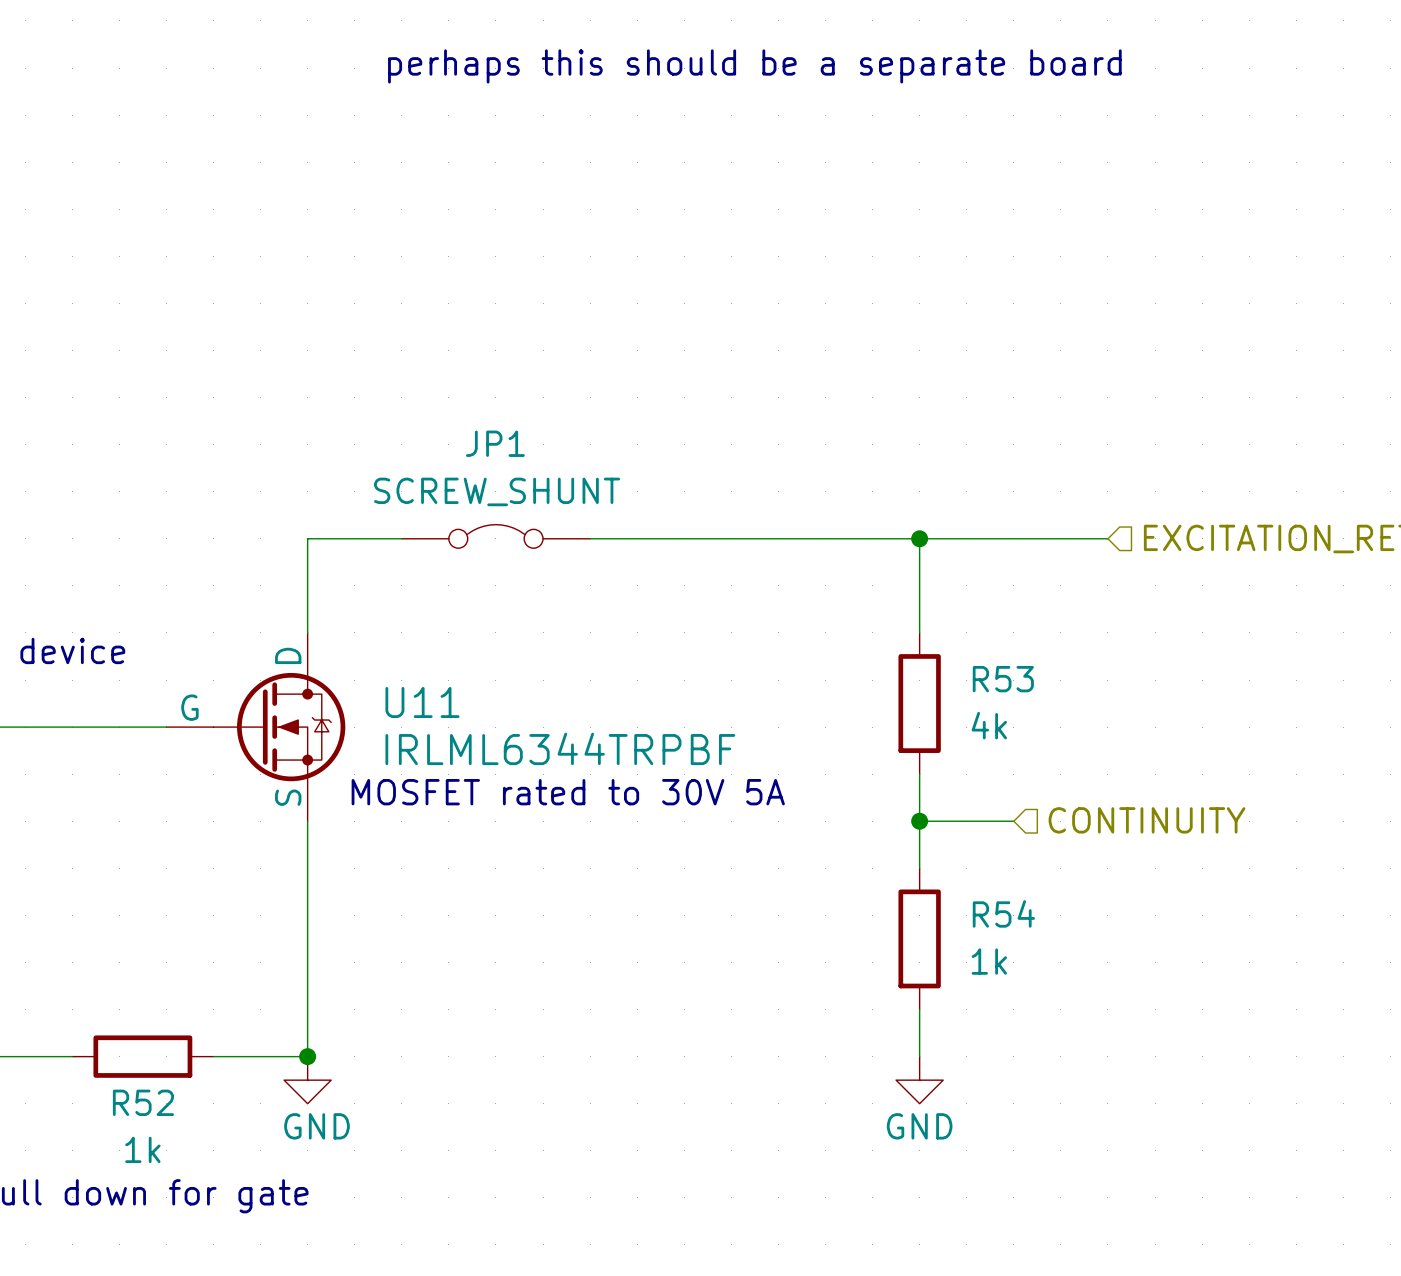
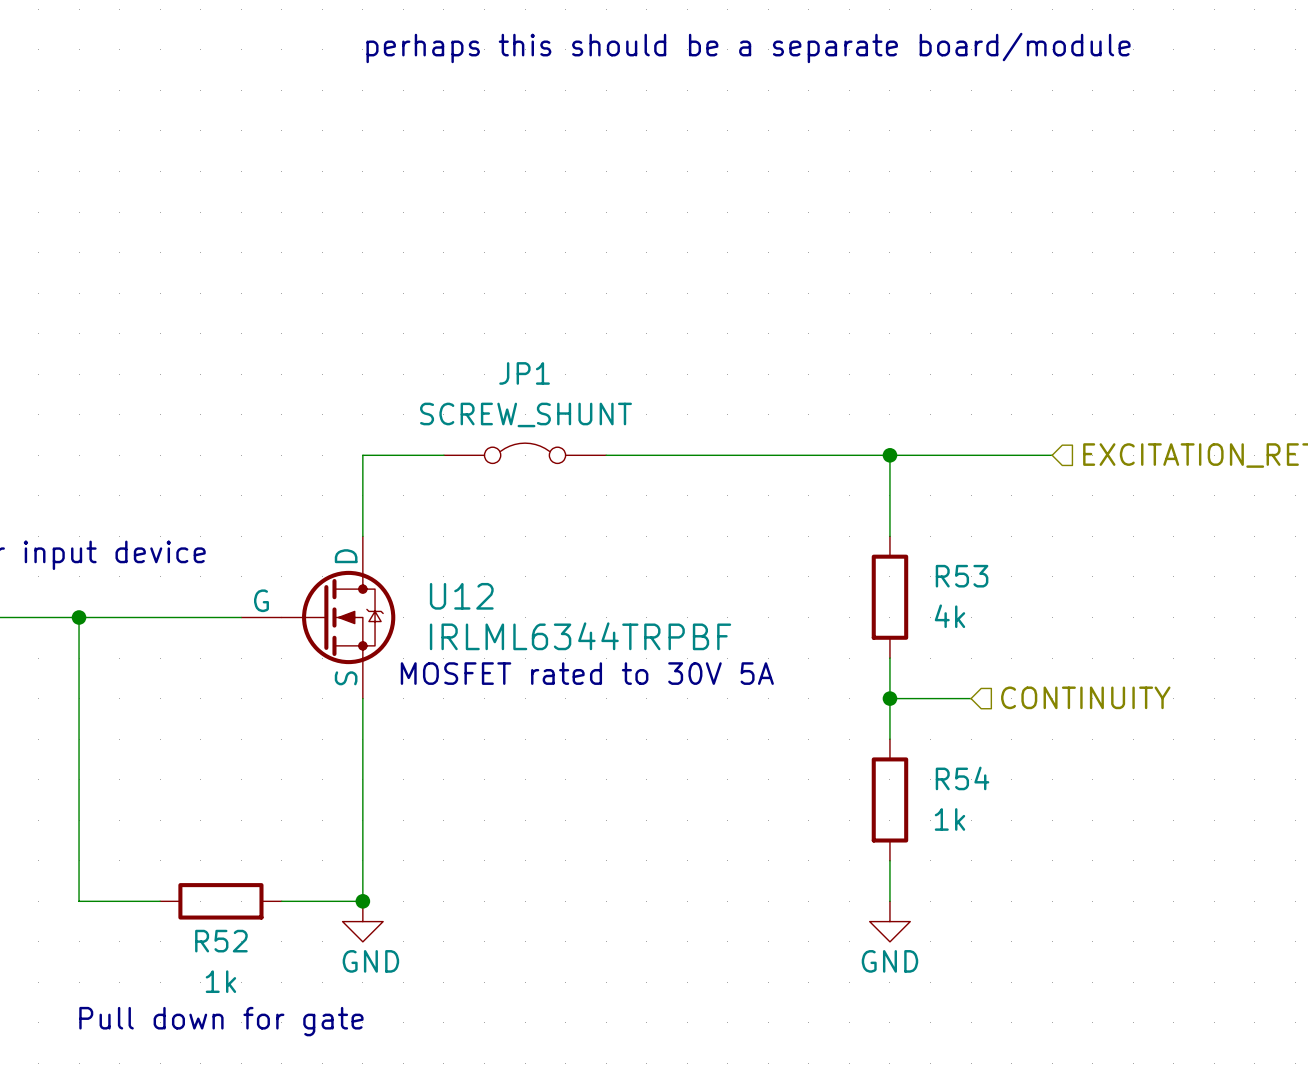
text: perhaps this should be a separate board (754, 66) -> perhaps this should be a separate board/module (748, 47)
U11 name: U11 (422, 702) -> U12 (461, 596)

